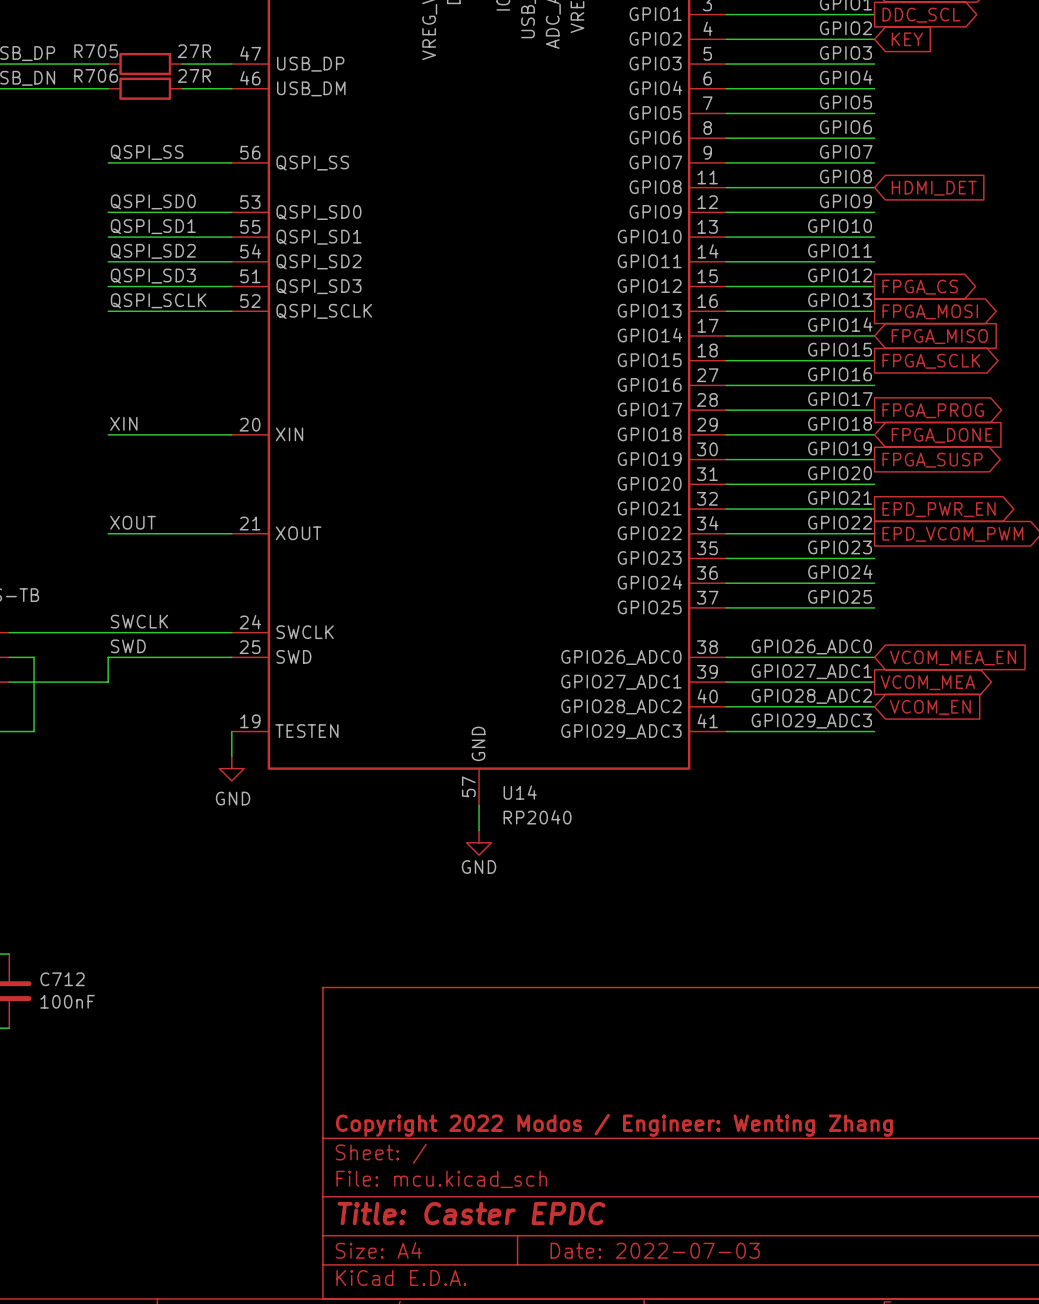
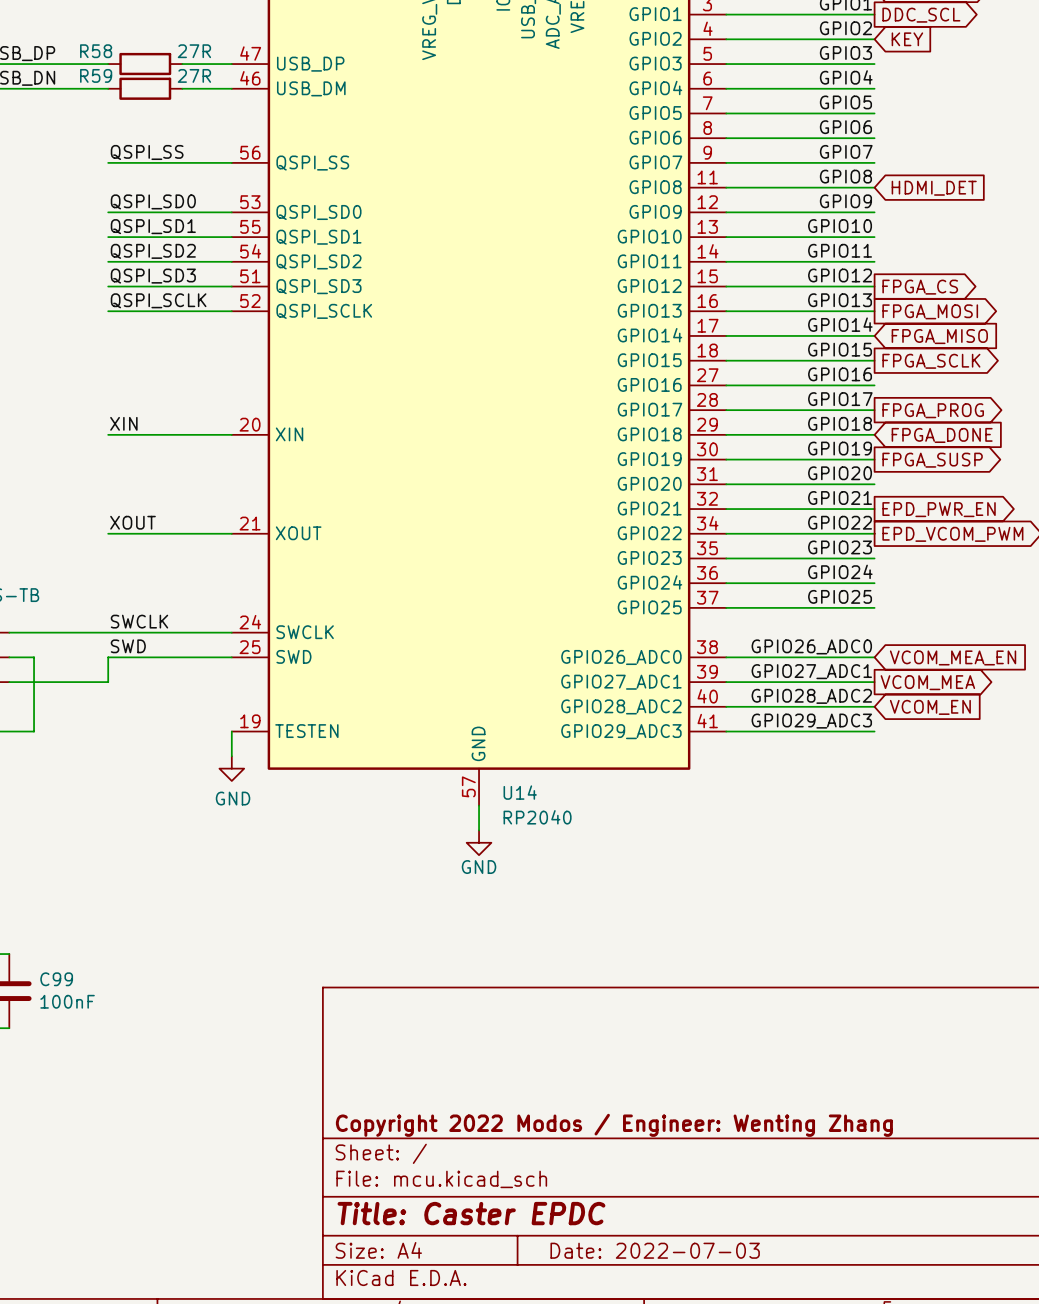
R705 name: R705 (96, 51) -> R58 (96, 51)
R706 name: R706 (96, 75) -> R59 (96, 75)
C712 name: C712 (62, 979) -> C99 (56, 979)

